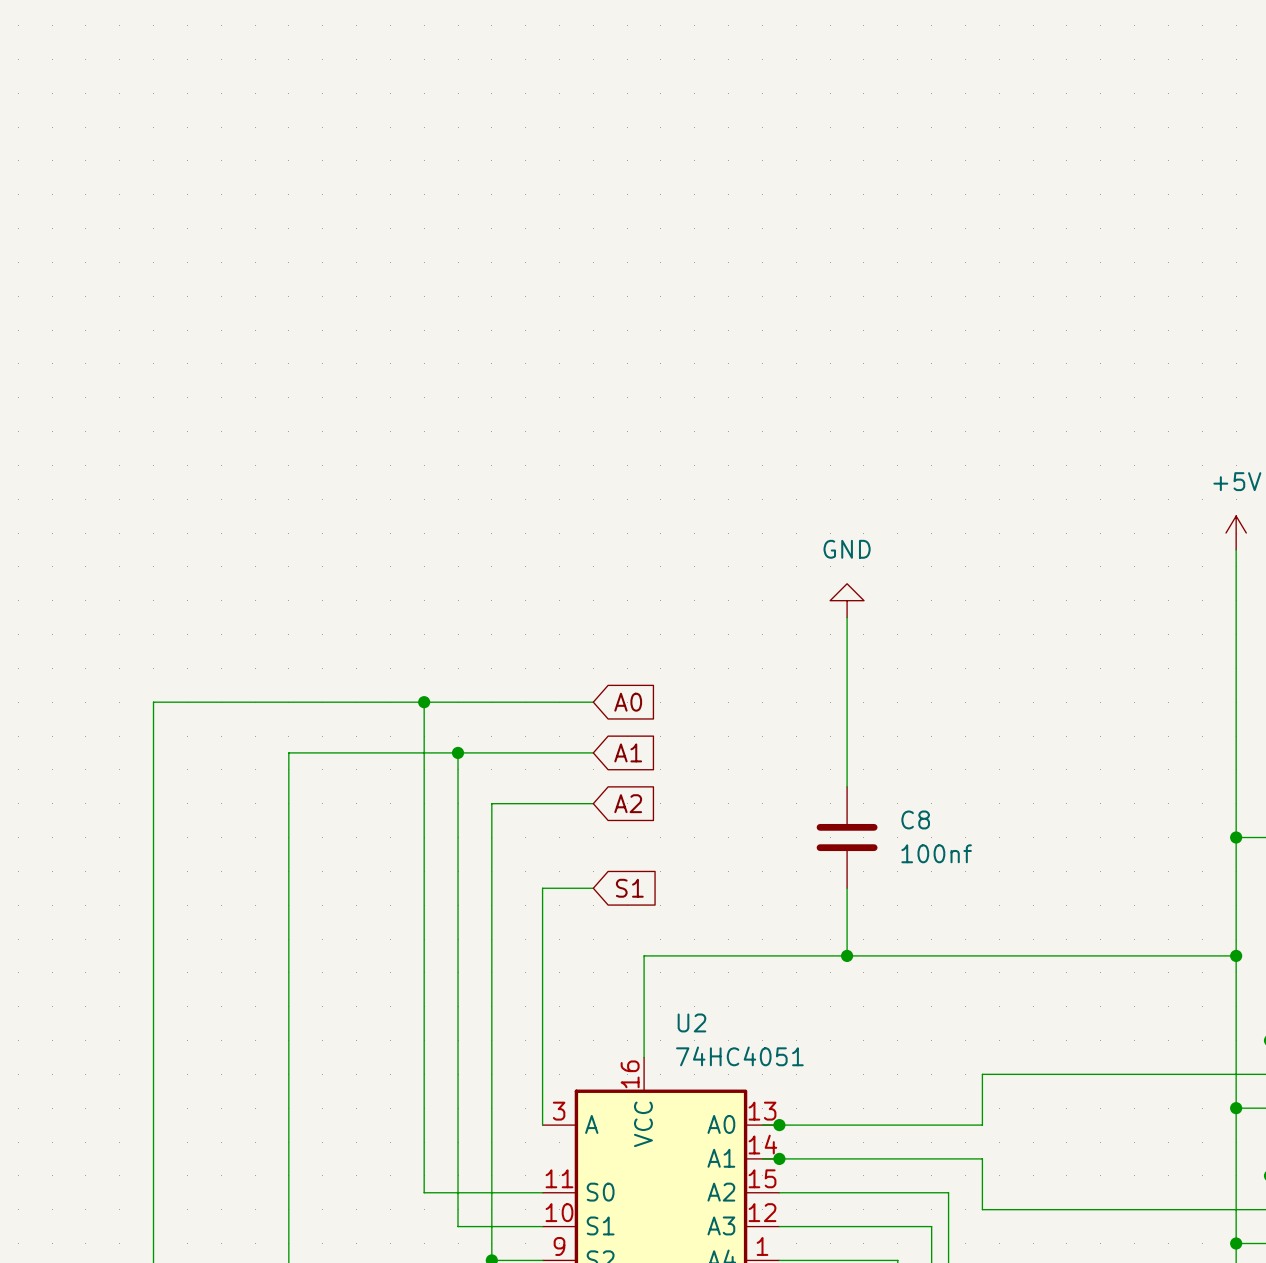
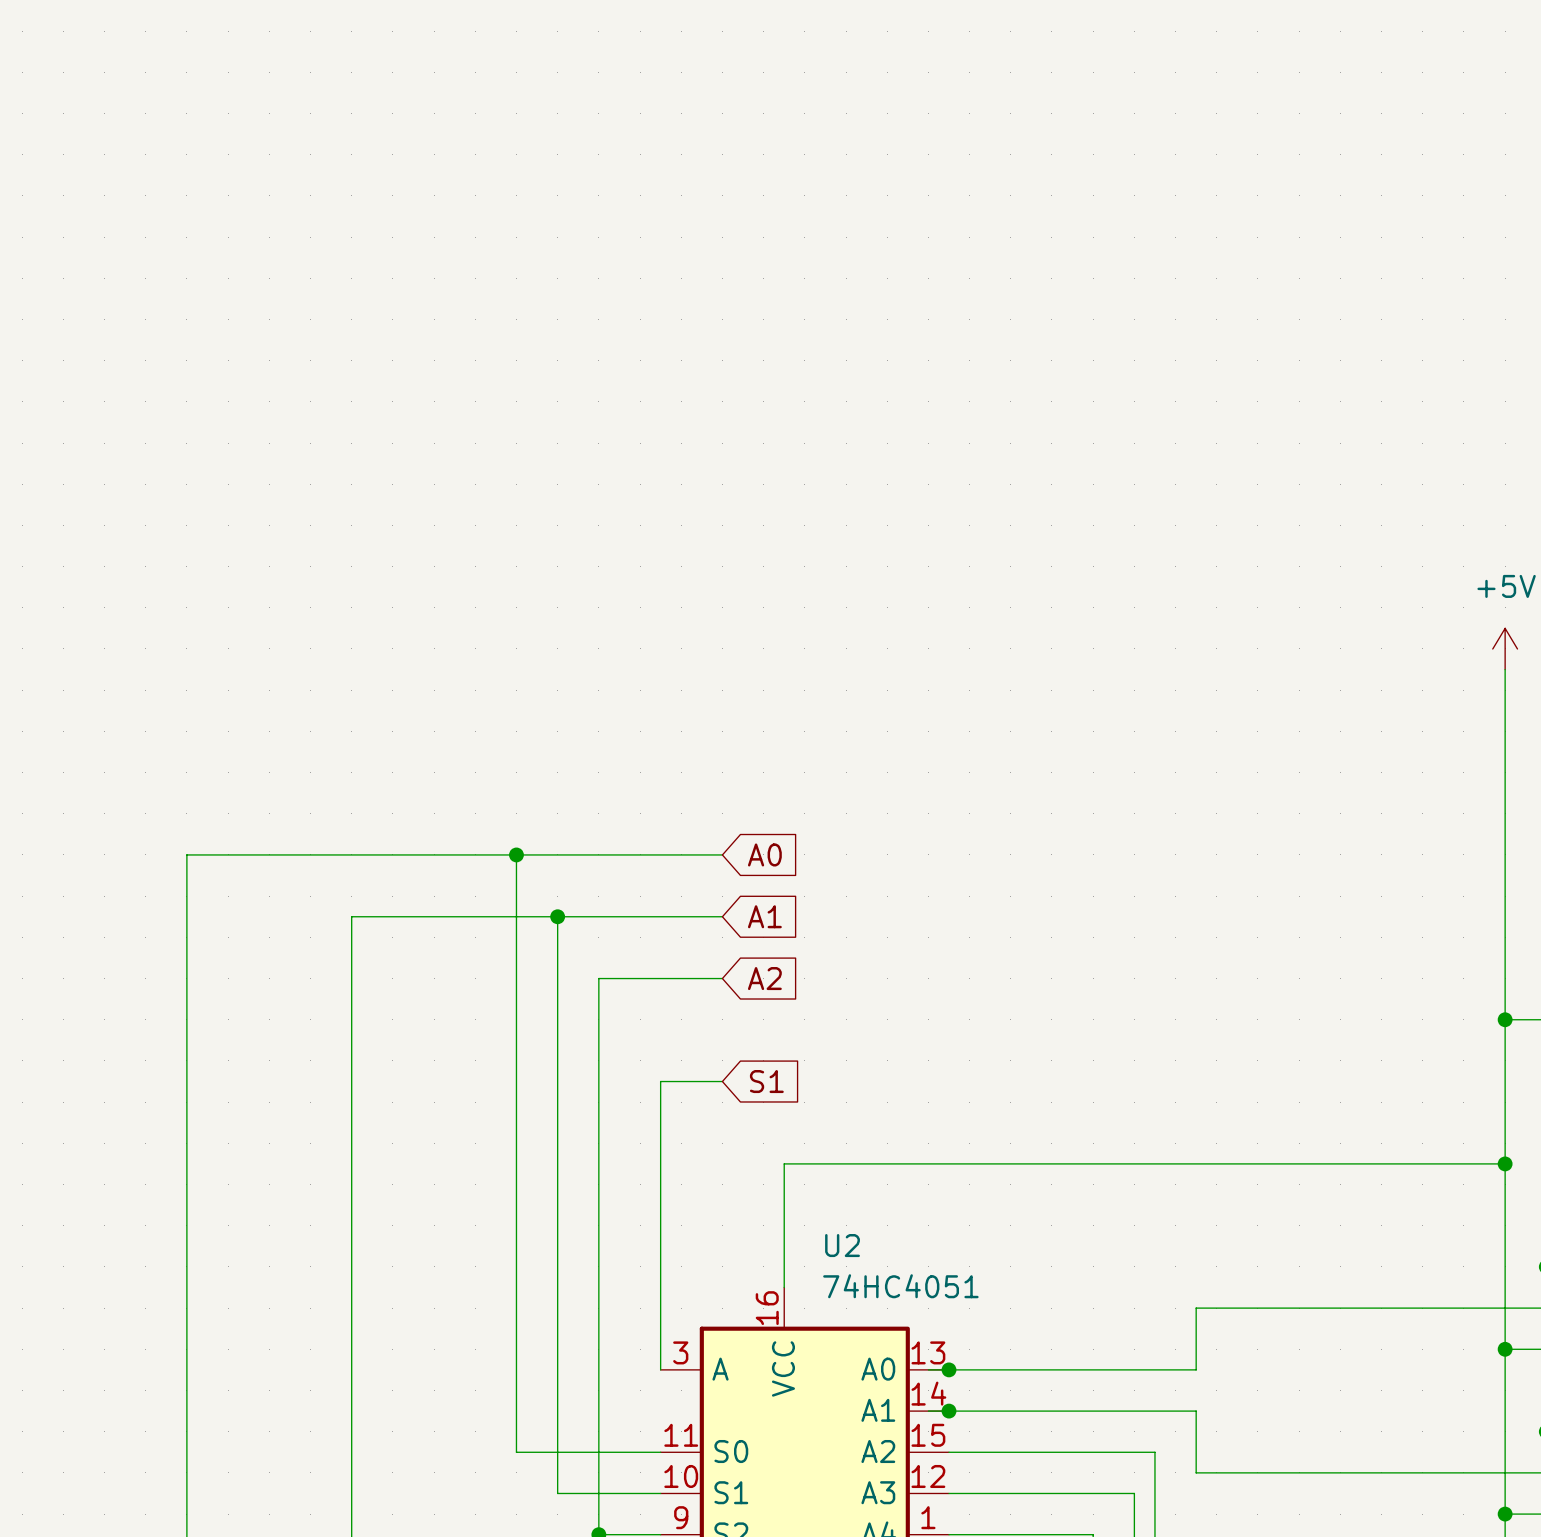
power symbol: GND (847, 600) -> none
wire: (847, 617) (847, 786) -> none
C8: 100nf (847, 837) -> none
wire: (847, 888) (847, 955) -> none
junction: (847, 955) -> none

